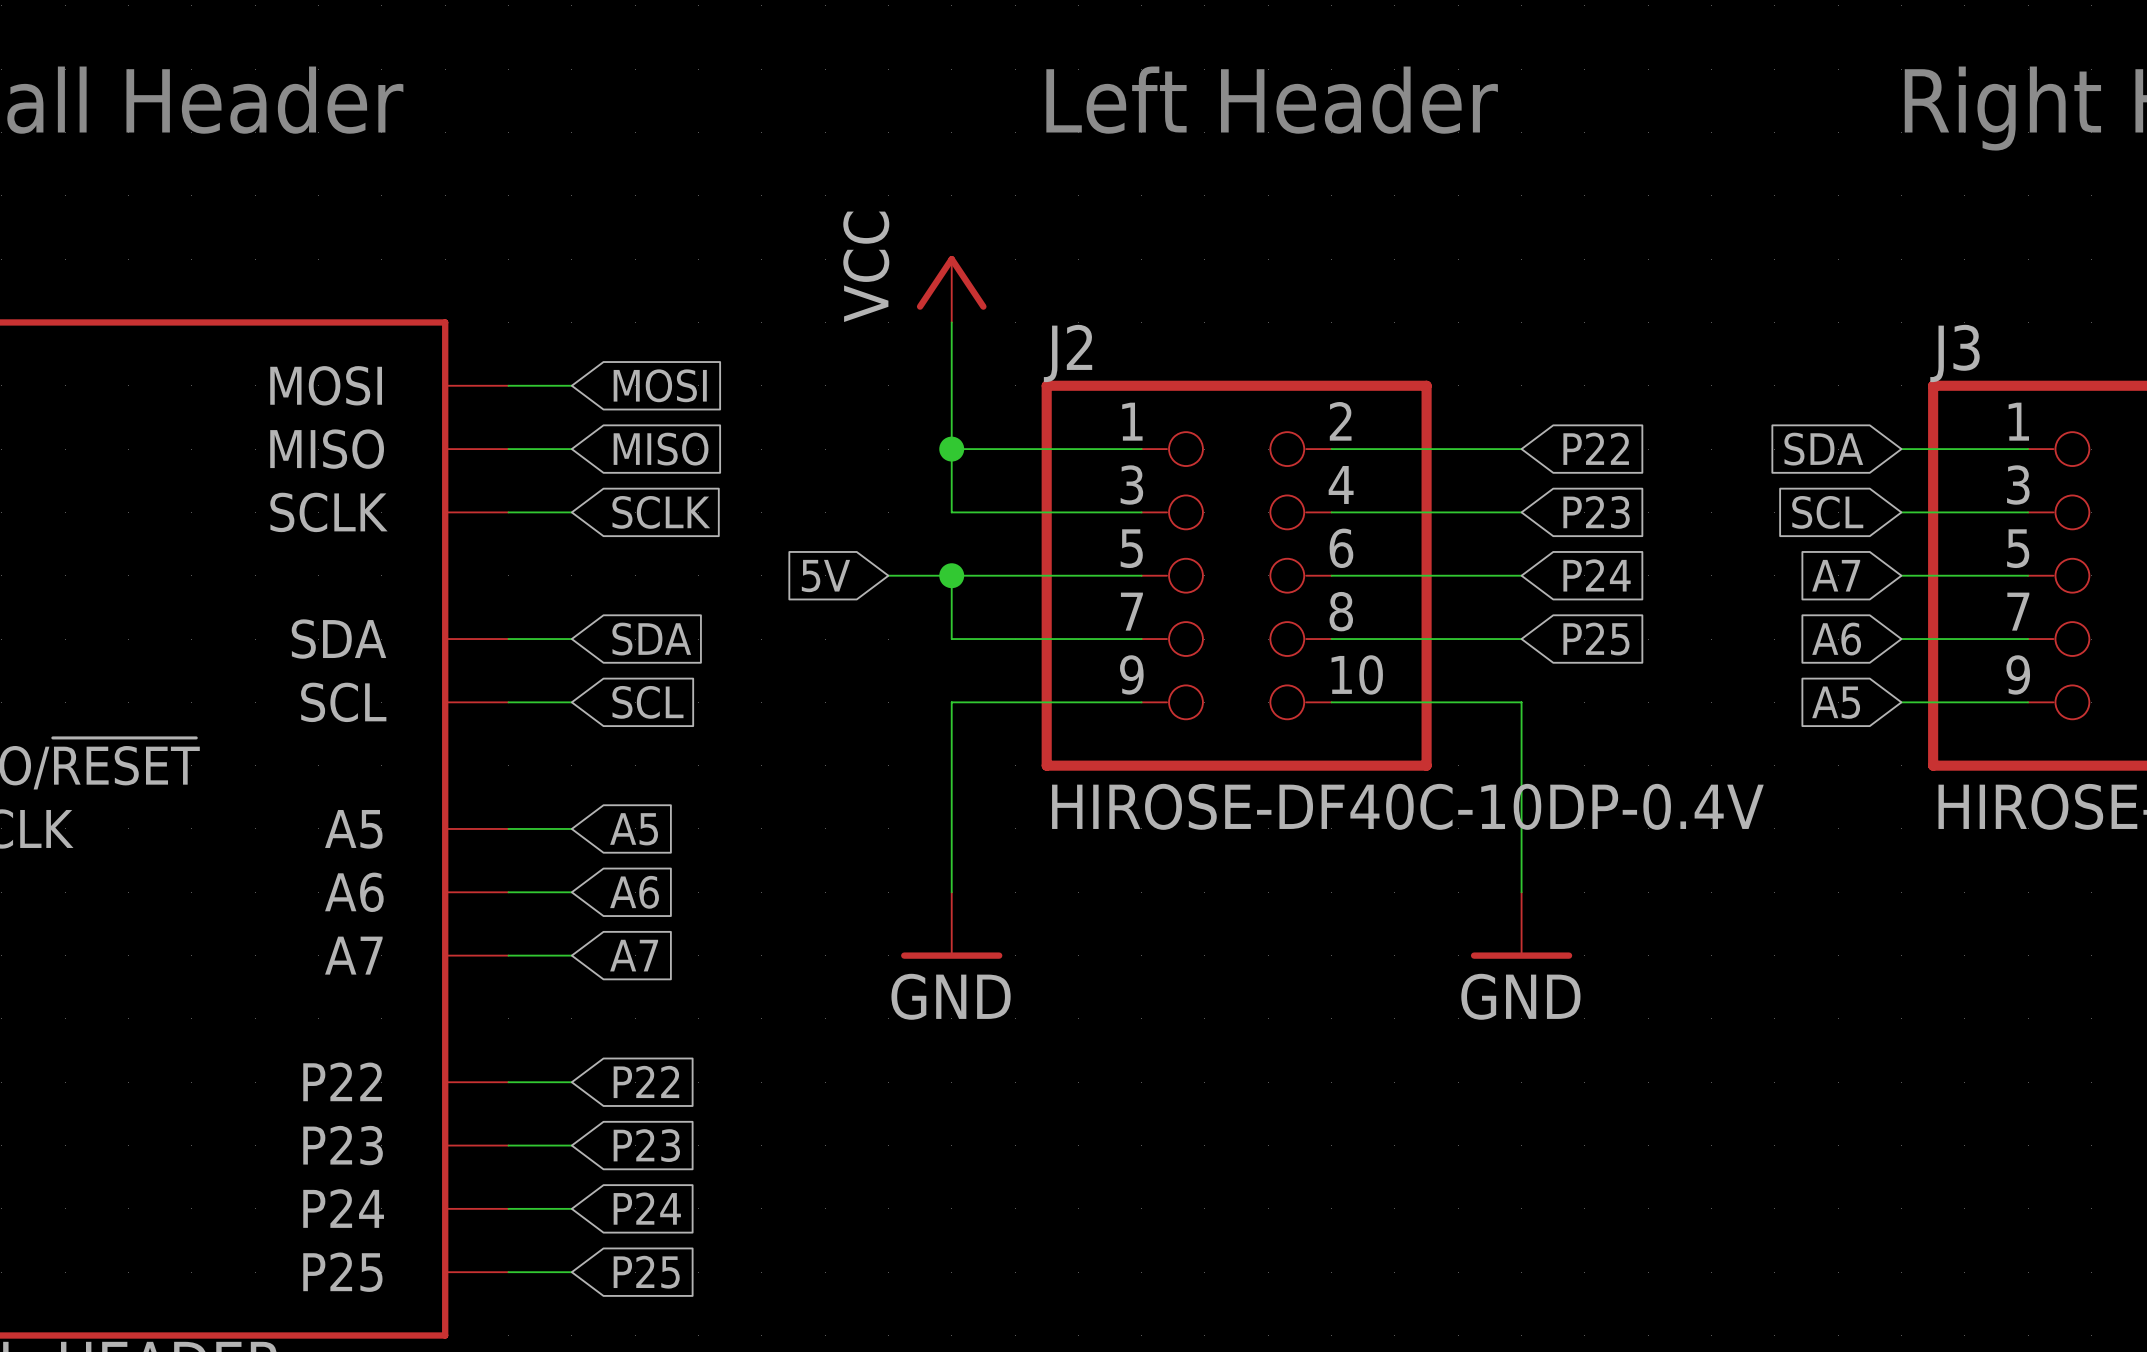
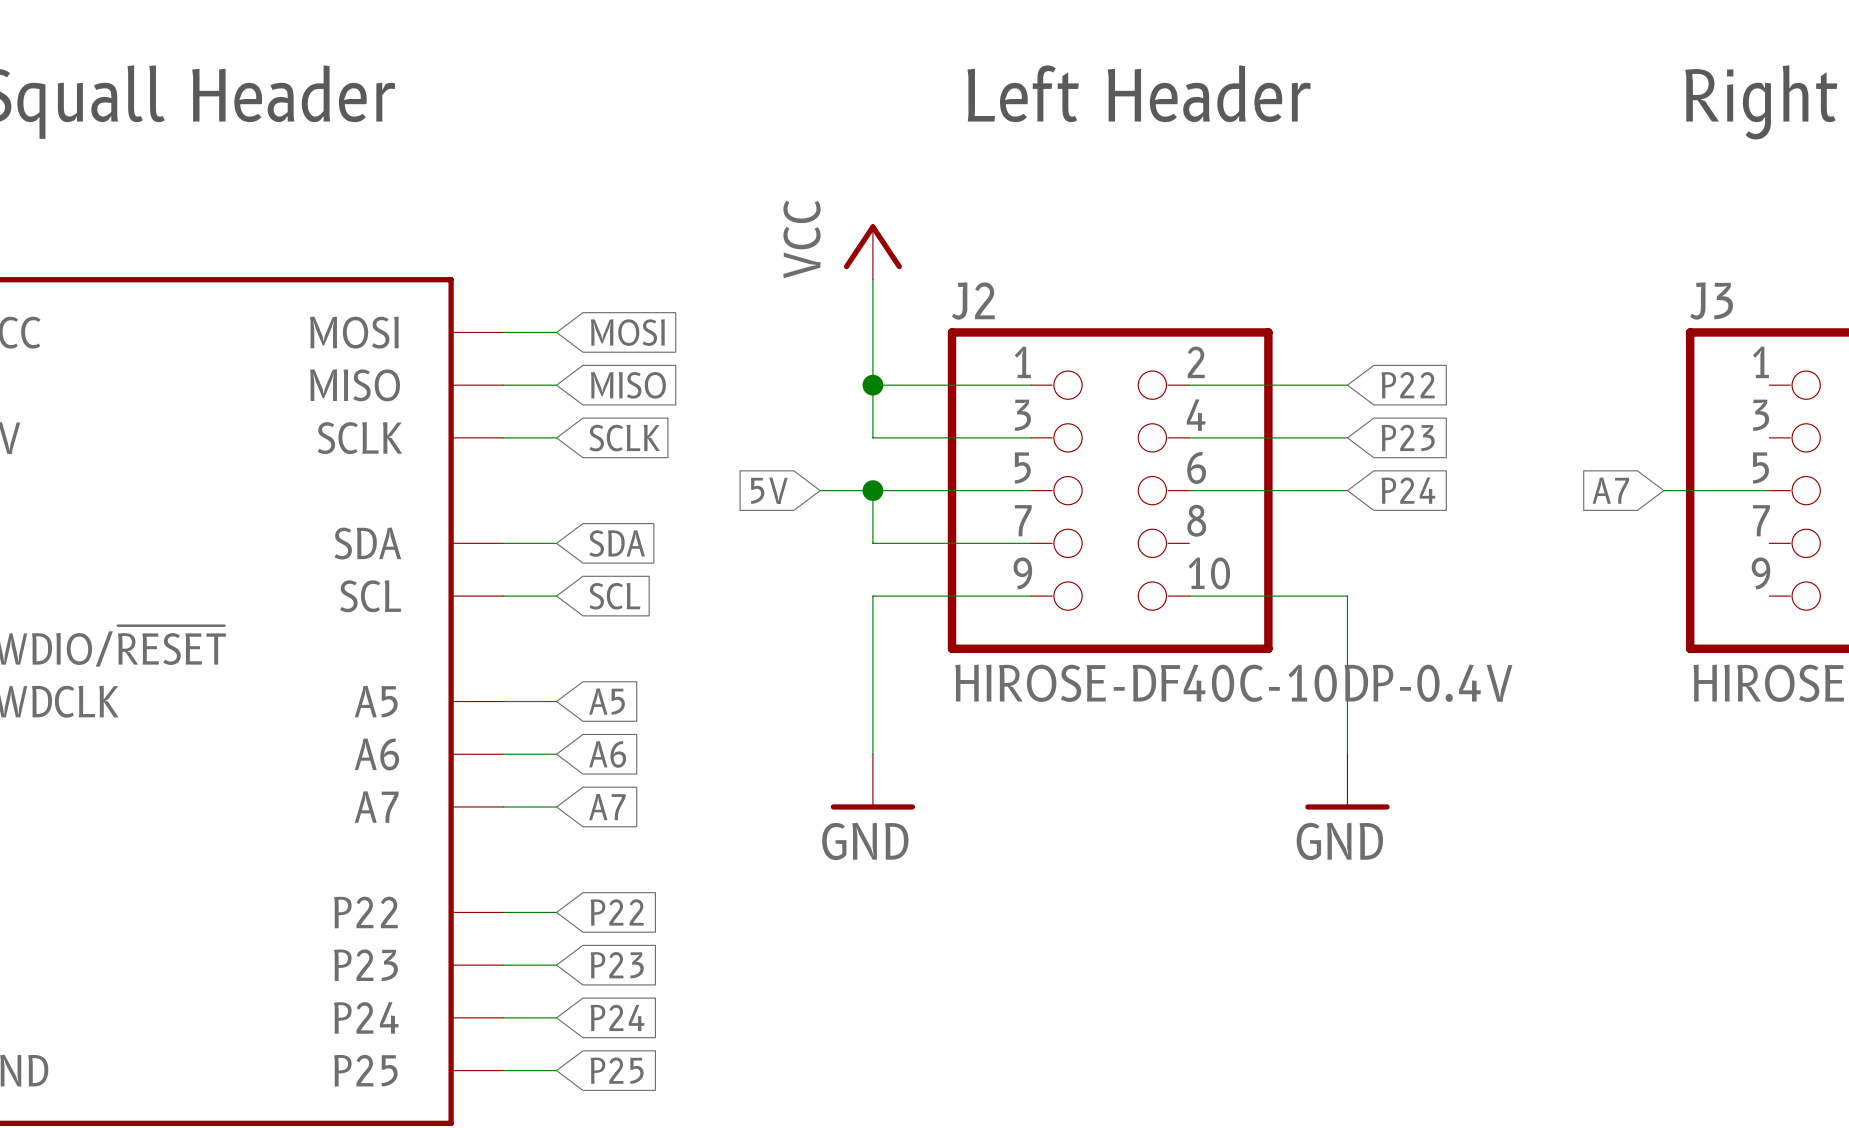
global label: SDA (1823, 449) -> none
wire: (1901, 449) (2028, 449) -> none
global label: SCL (1827, 512) -> none
wire: (1901, 512) (2028, 512) -> none
wire: (1331, 639) (1521, 639) -> none
global label: P25 (1596, 639) -> none
global label: A6 (1836, 639) -> none
wire: (1901, 639) (2028, 639) -> none
global label: A5 (1836, 702) -> none
wire: (1901, 702) (2028, 702) -> none

